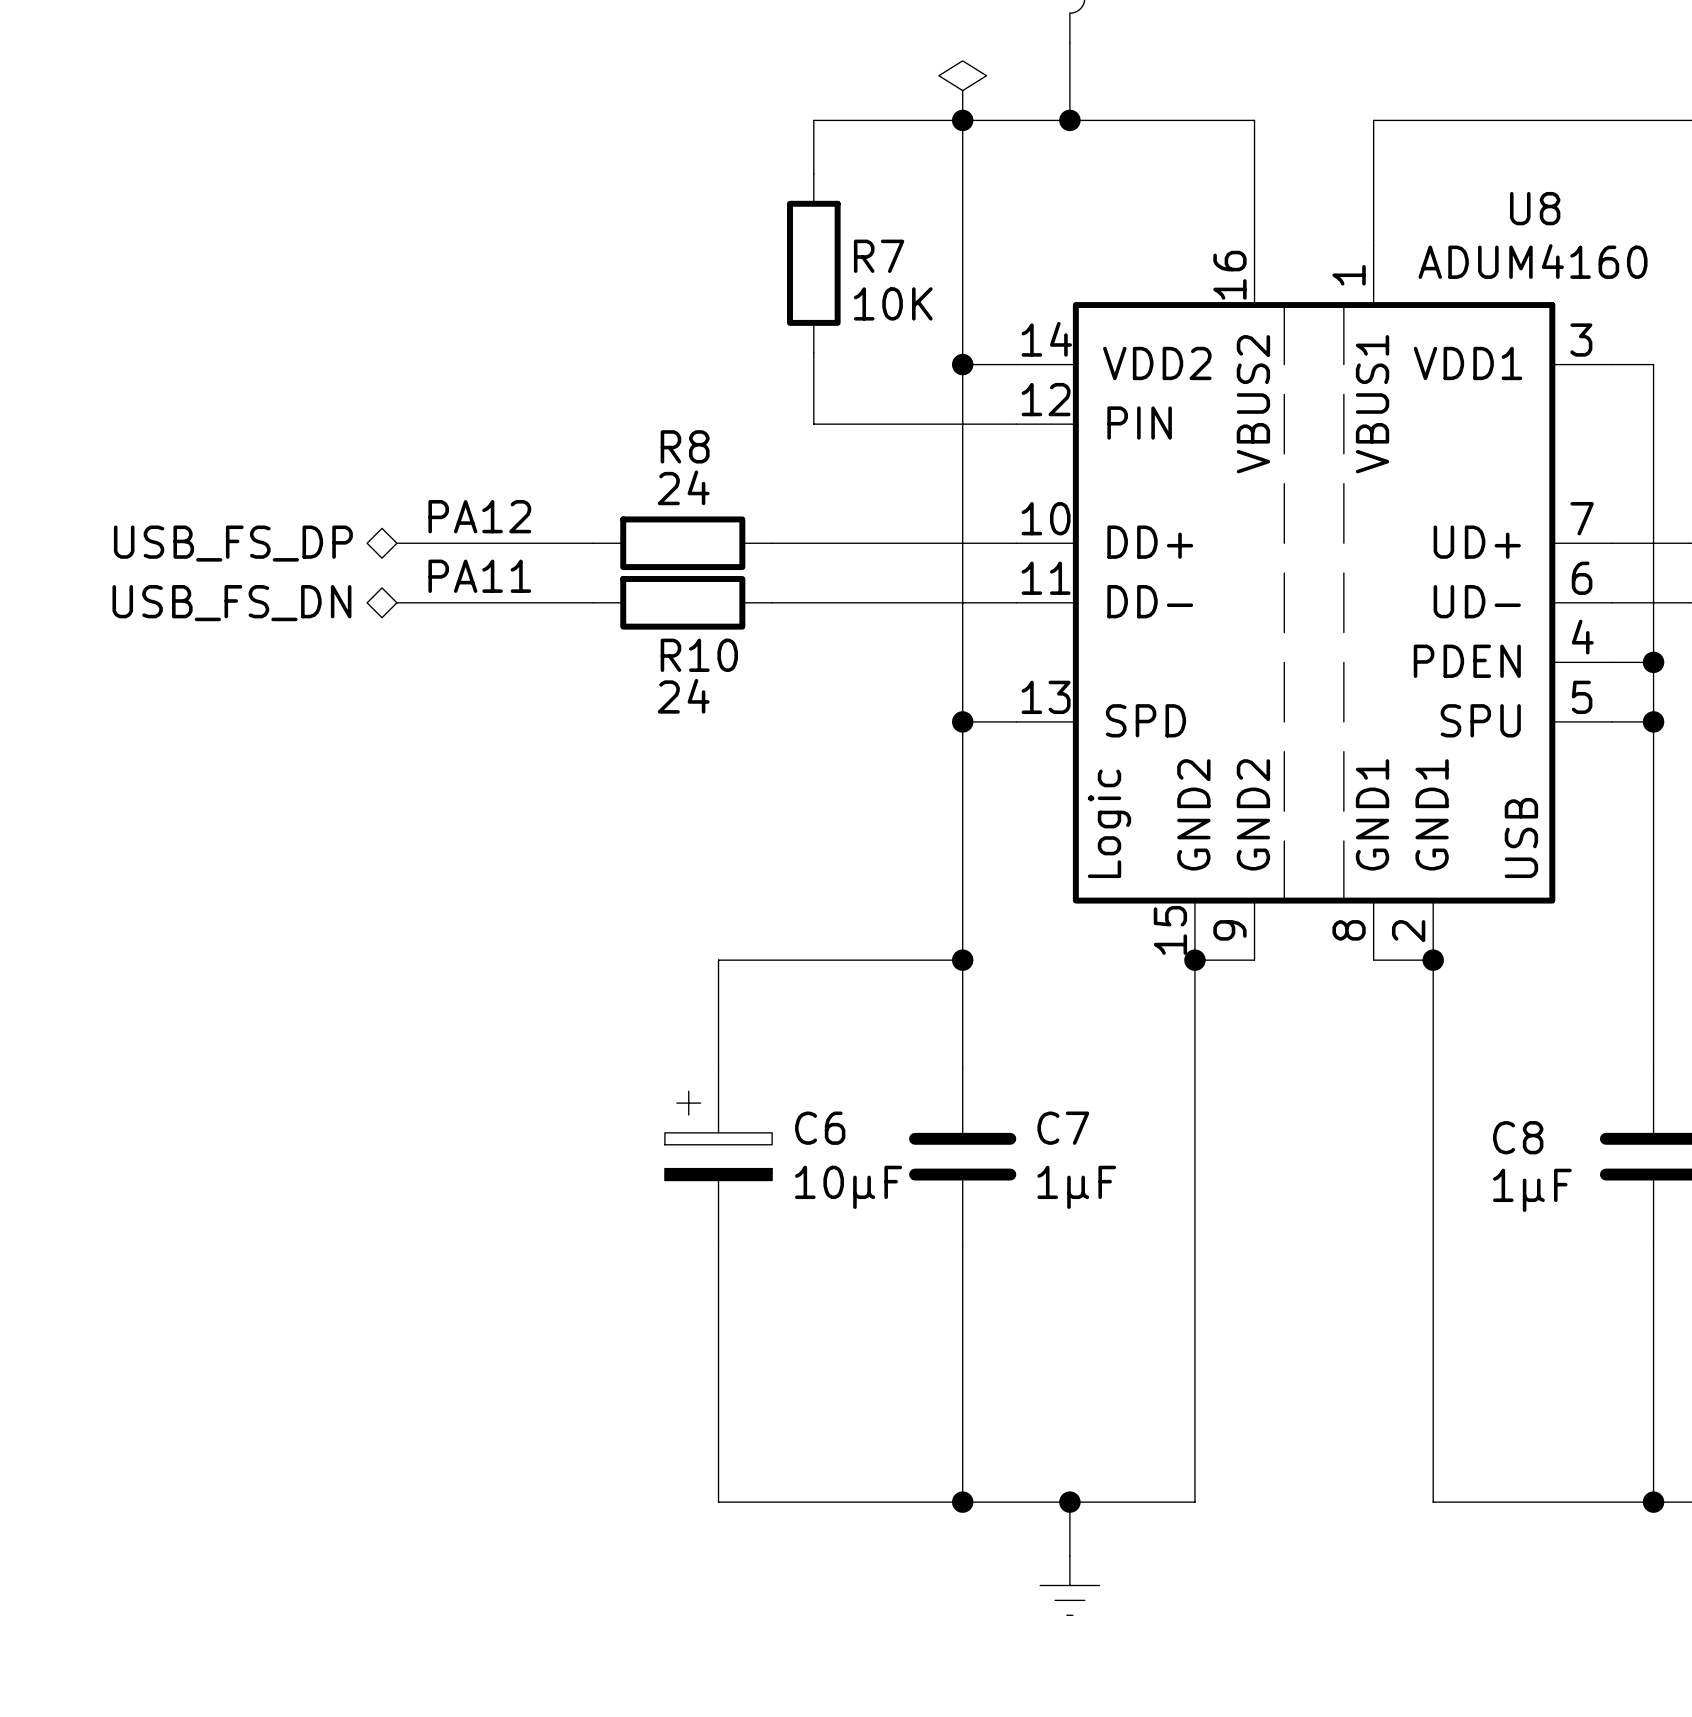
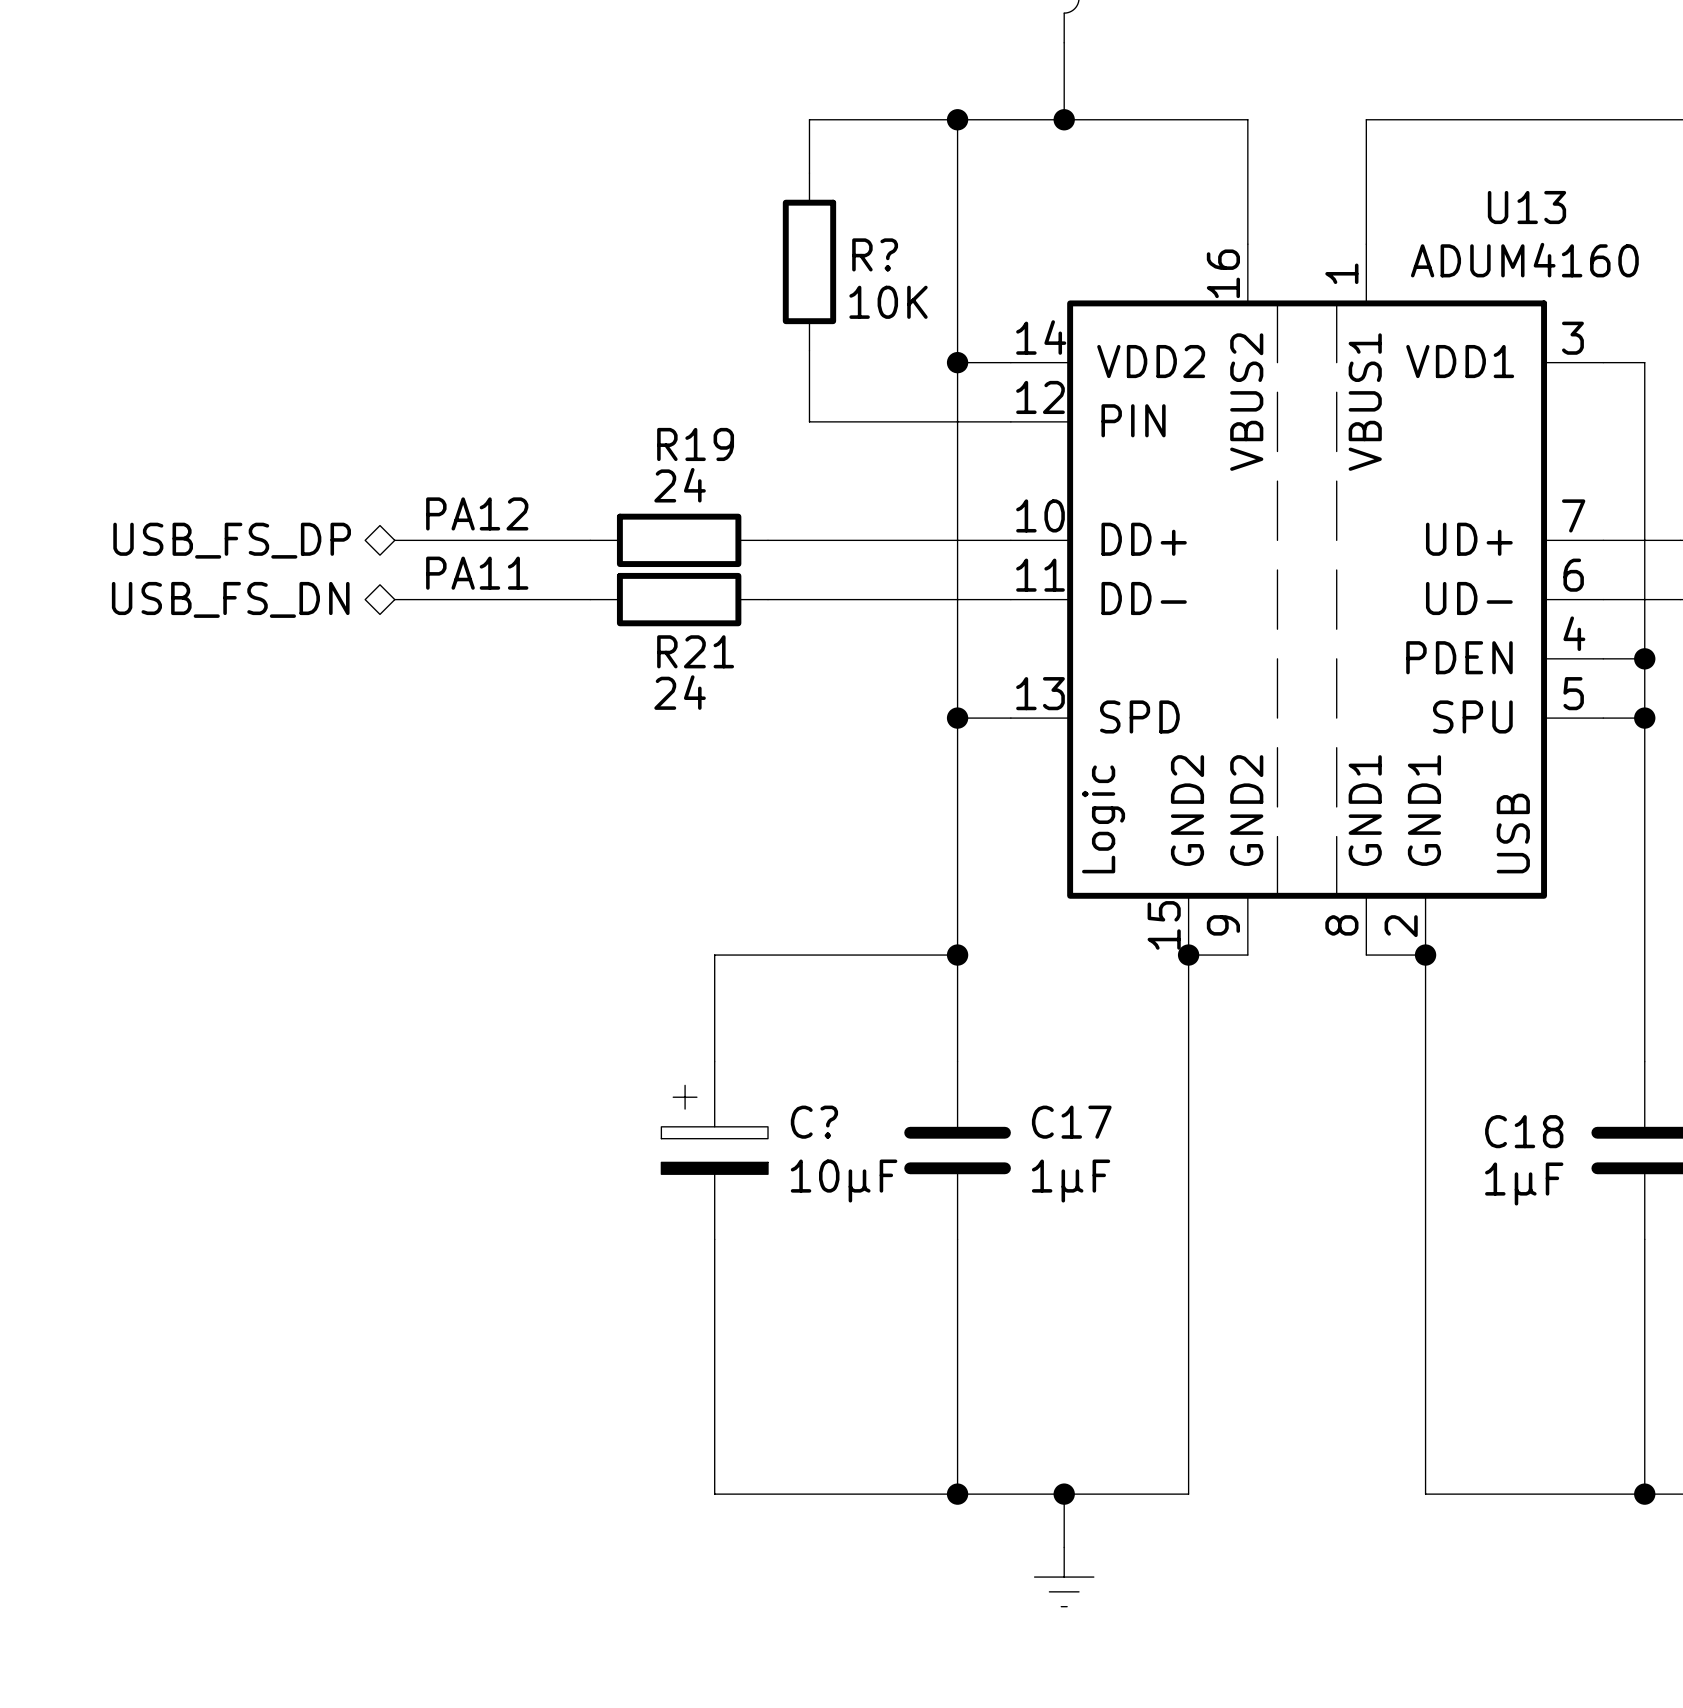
power symbol: (962, 90) -> none
U8 name: U8 (1535, 208) -> U13 (1526, 207)
R7 name: R7 (879, 256) -> R? (875, 254)
R8 name: R8 (685, 446) -> R19 (695, 444)
R10 name: R10 (699, 655) -> R21 (695, 651)
C6 name: C6 (820, 1128) -> C? (814, 1122)
C7 name: C7 (1063, 1128) -> C17 (1071, 1122)
C8 name: C8 (1518, 1137) -> C18 (1524, 1131)

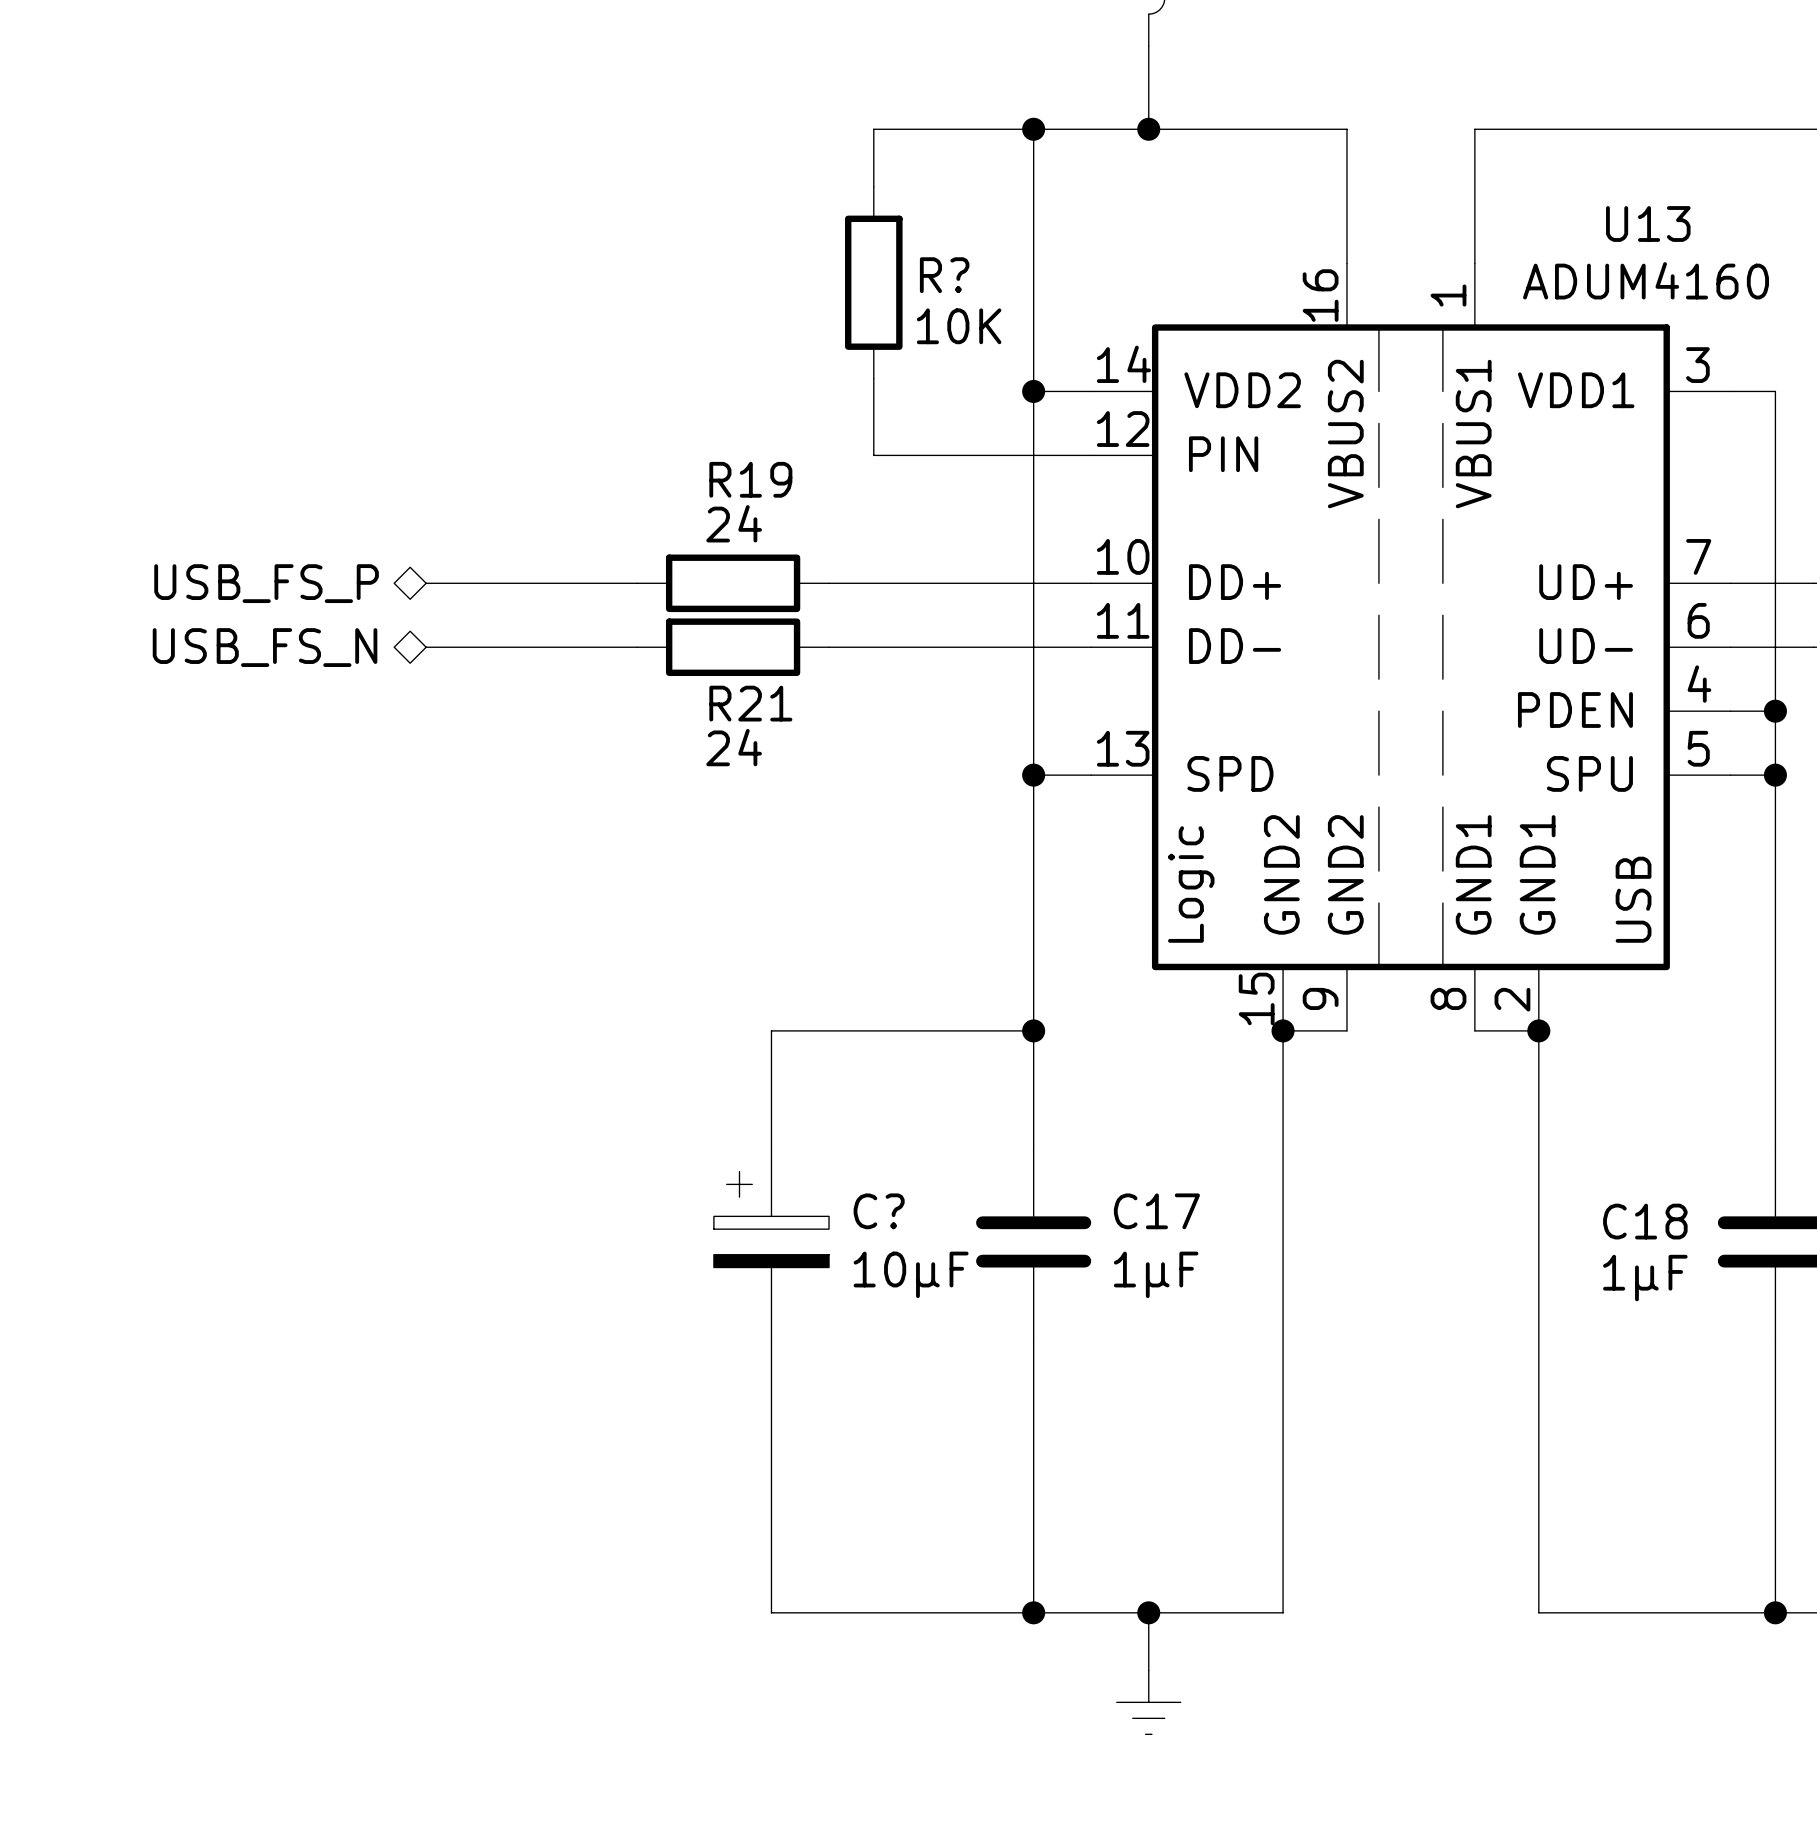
label: PA12 (477, 513) -> none
hierarchical label: USB_FS_DP (232, 540) -> USB_FS_P (266, 583)
label: PA11 (477, 573) -> none
hierarchical label: USB_FS_DN (230, 599) -> USB_FS_N (265, 647)

